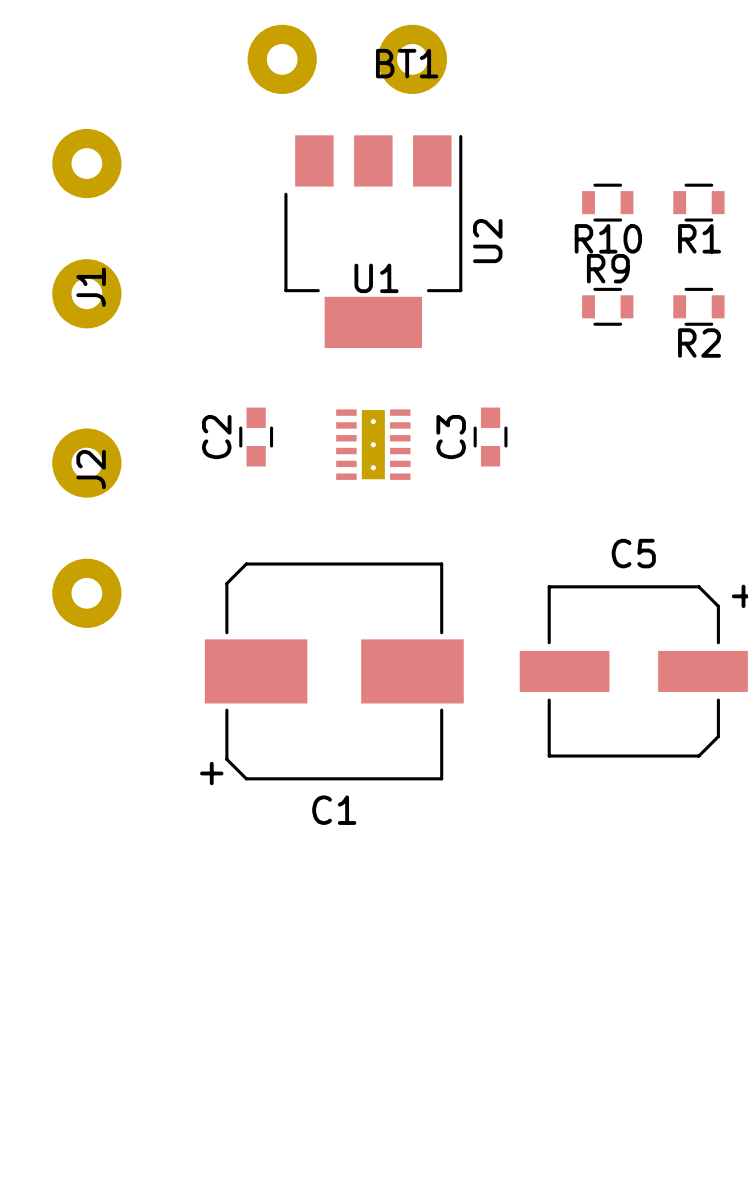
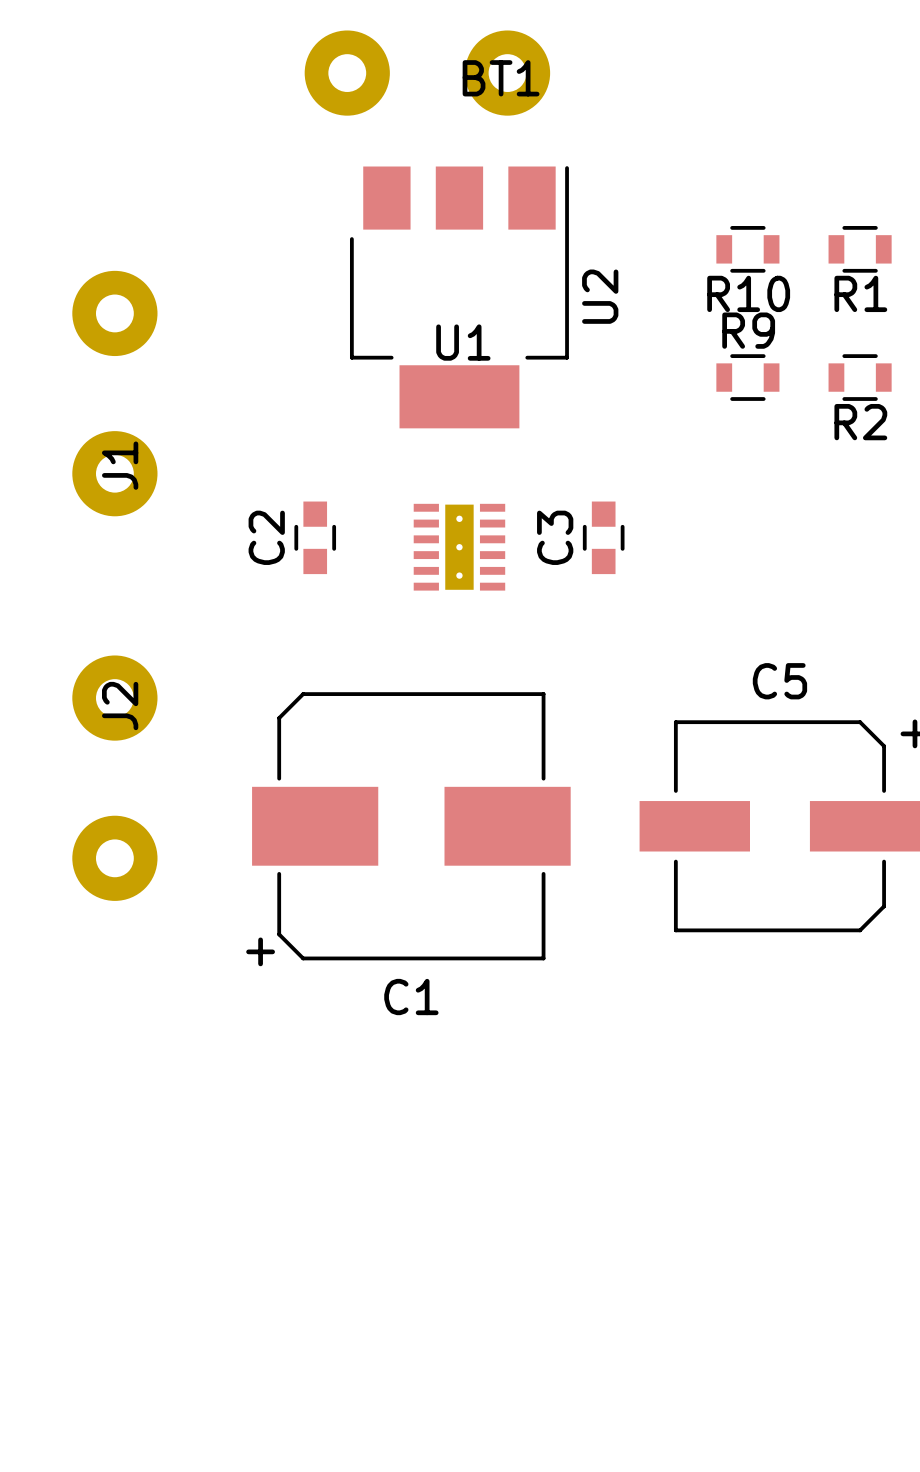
J1 position: (86, 228) -> (114, 393)
J2 position: (86, 528) -> (114, 778)

